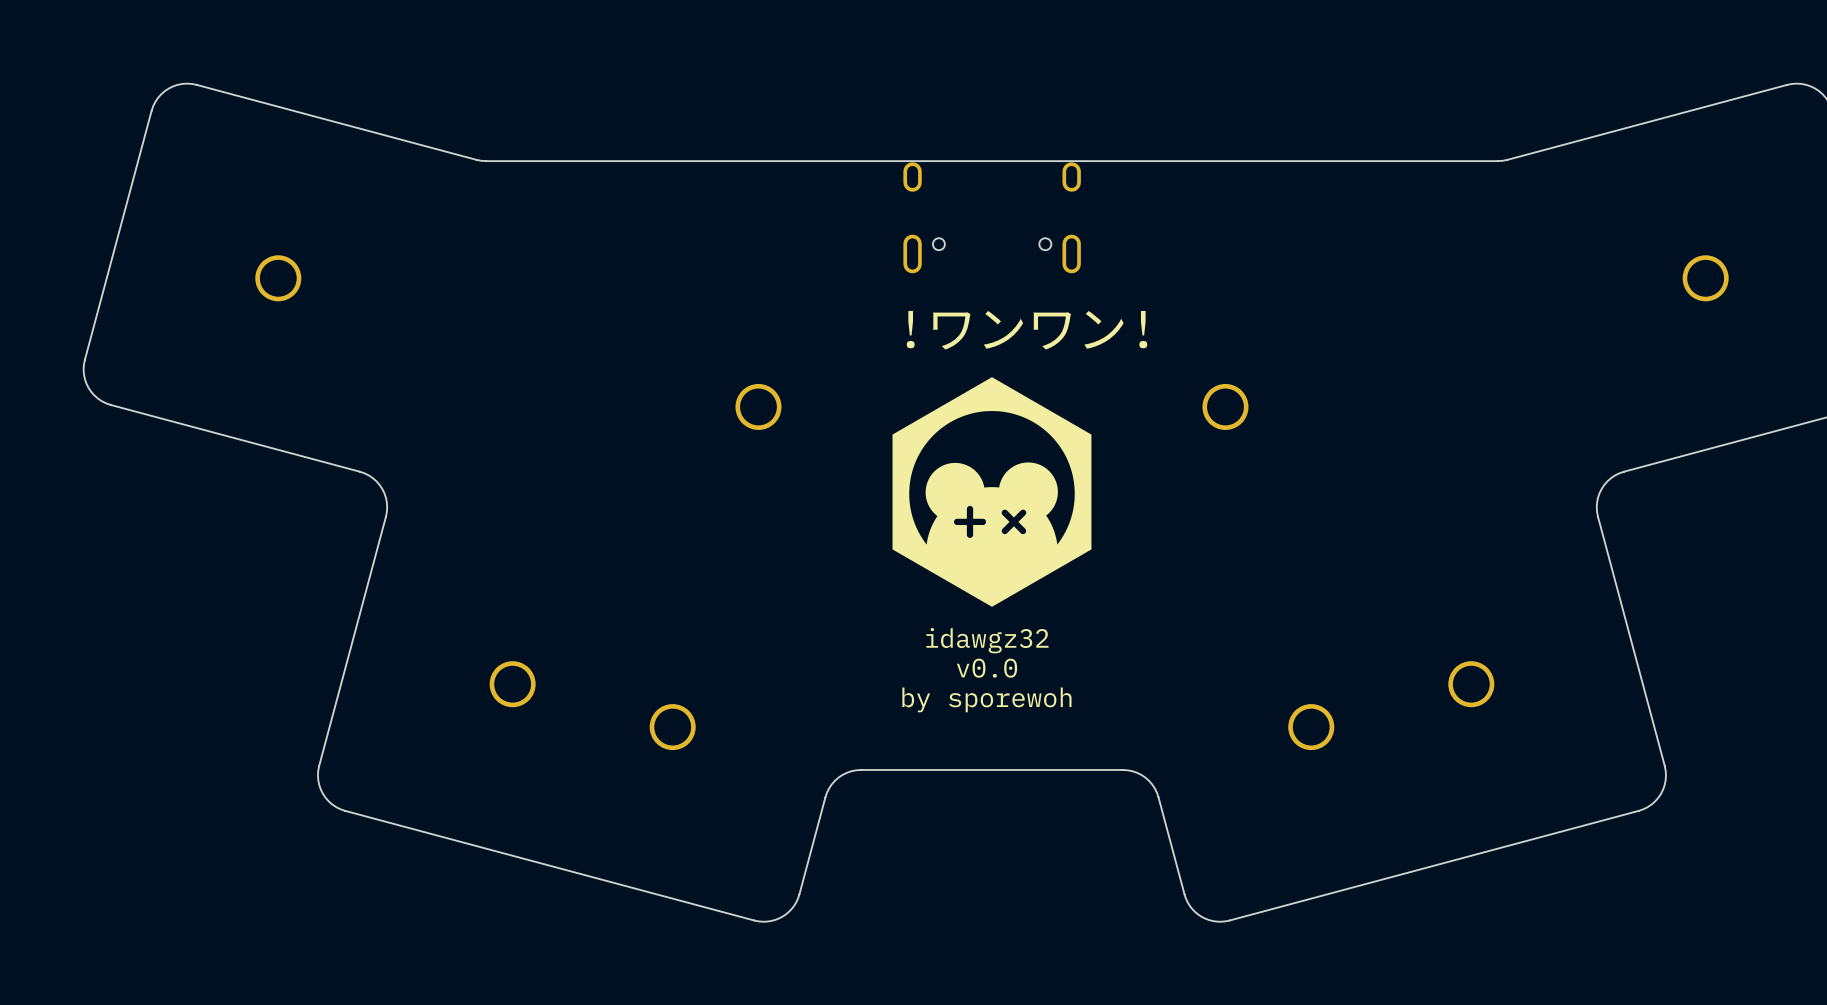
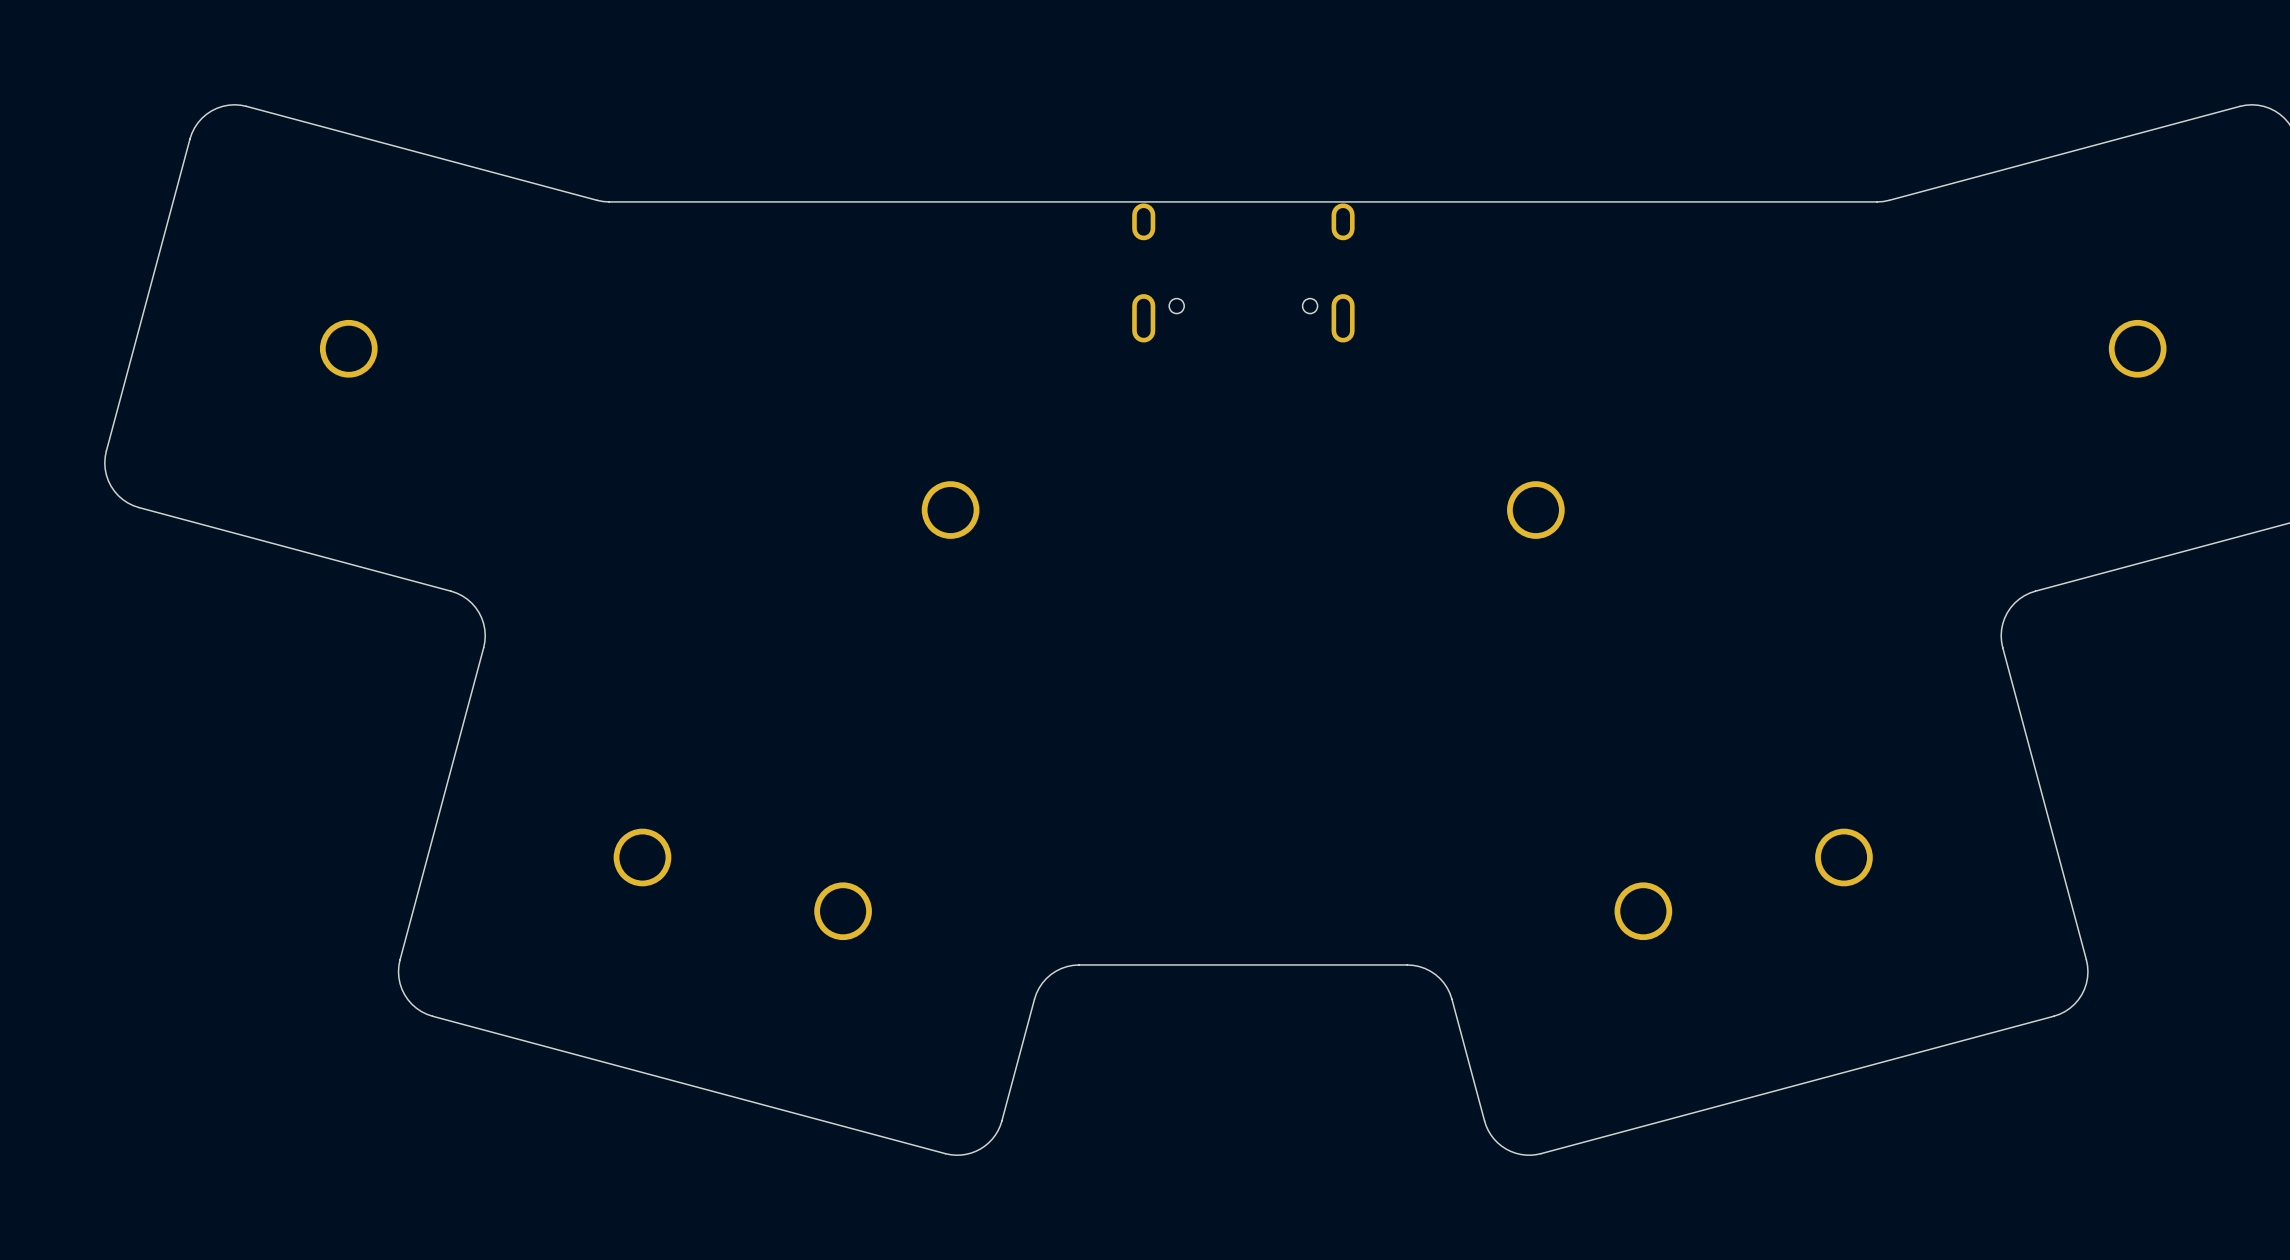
text: !ワンワン! (1026, 330) -> none
drawing: [892, 377, 1092, 607] -> none
text: idawgz32 (987, 640) -> none
text: v0.0 (987, 668) -> none
text: by sporewoh (986, 699) -> none

